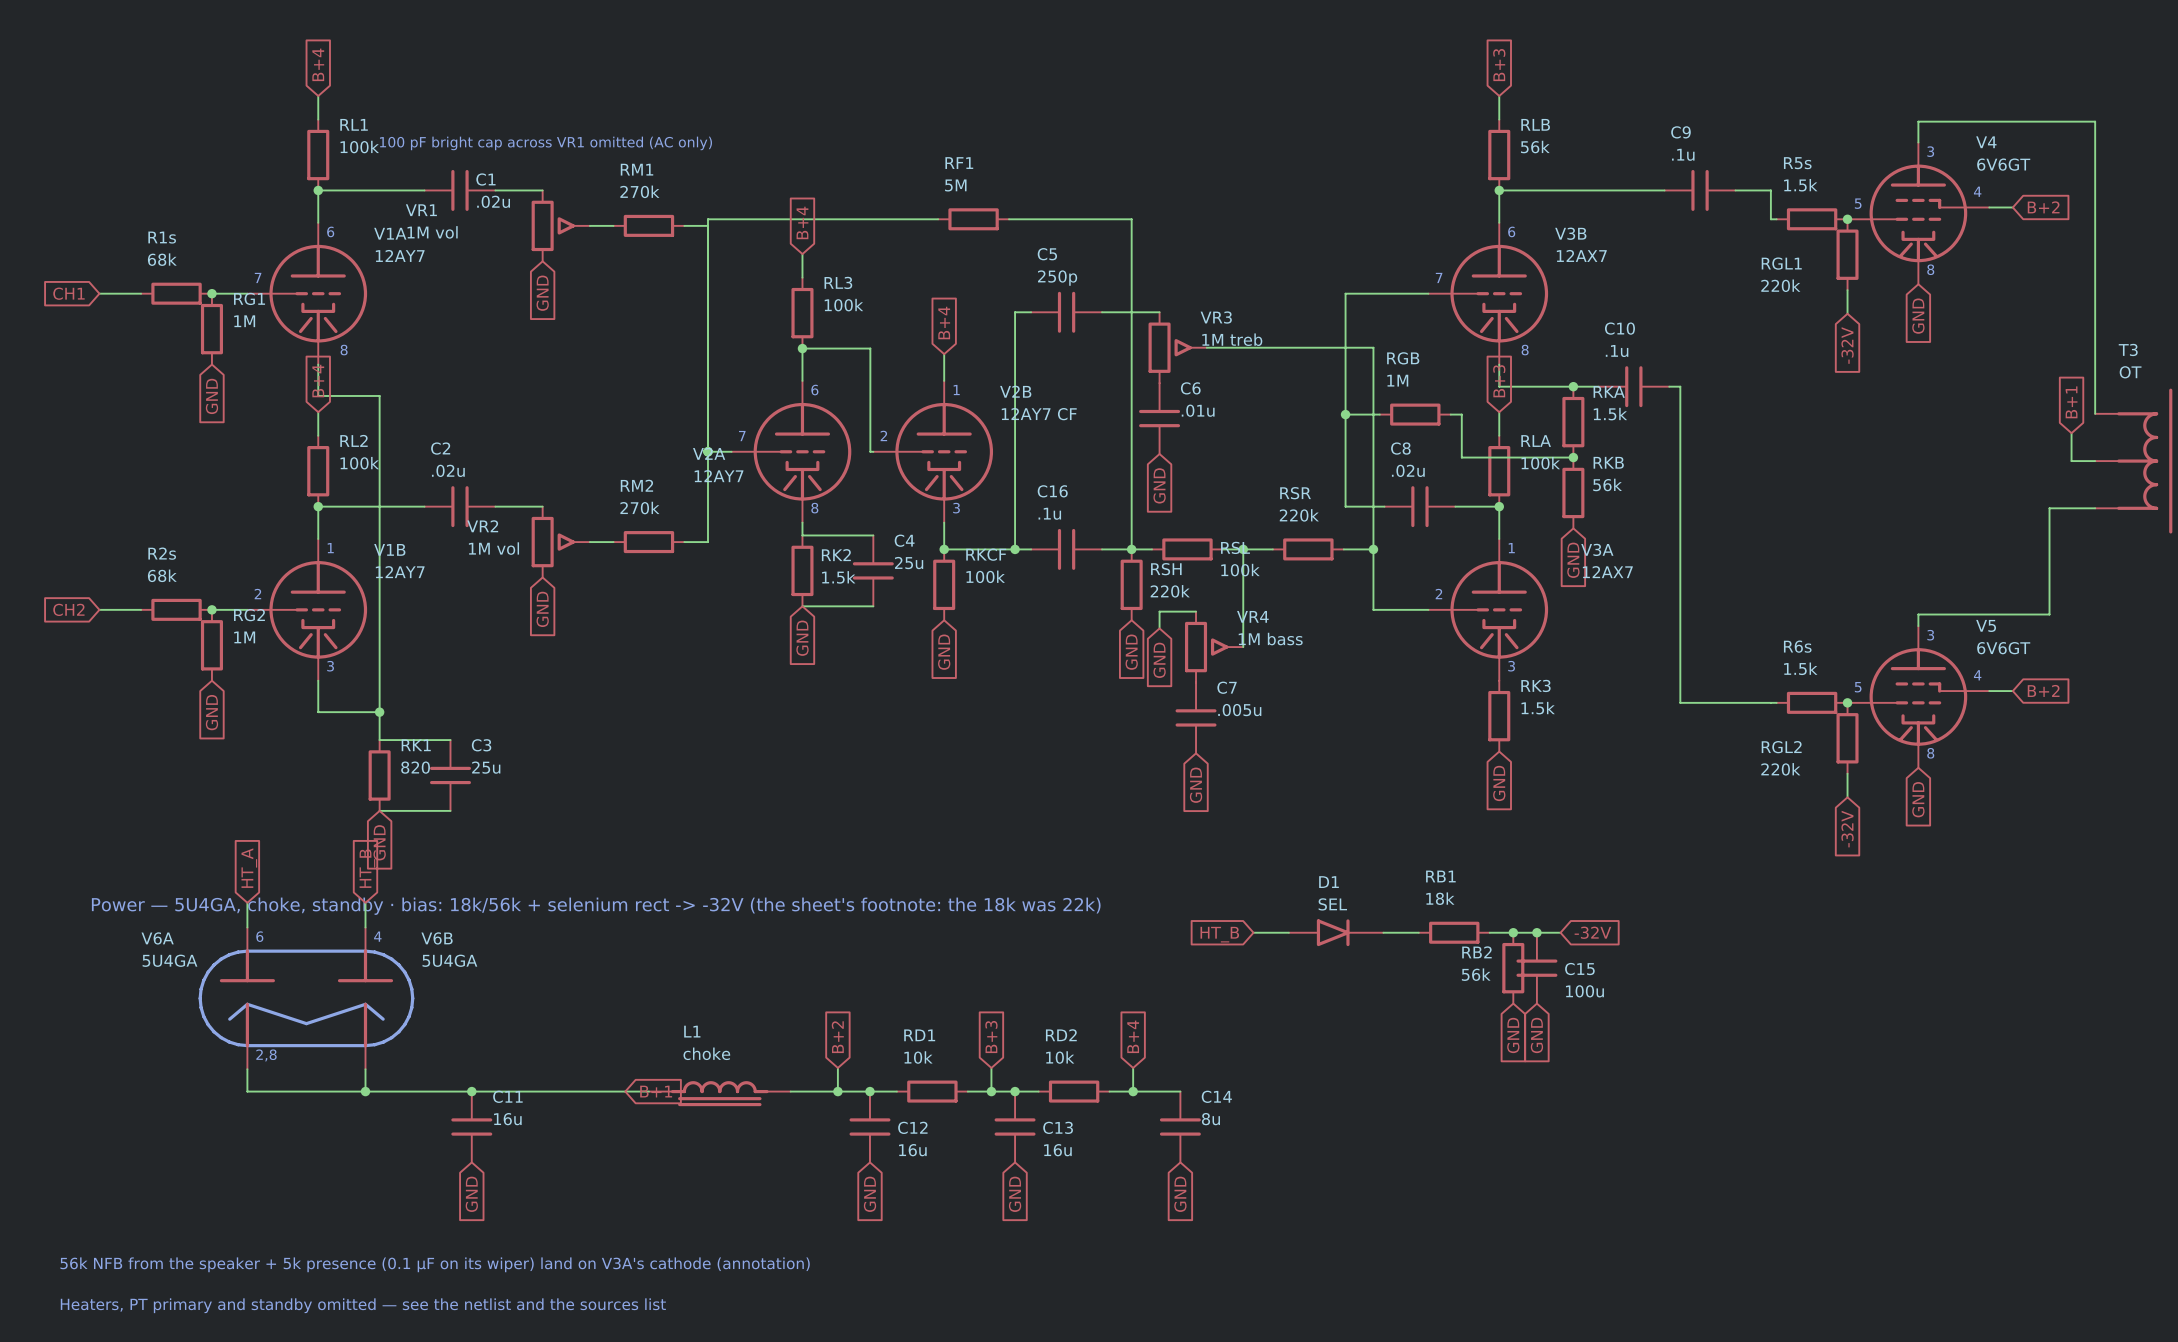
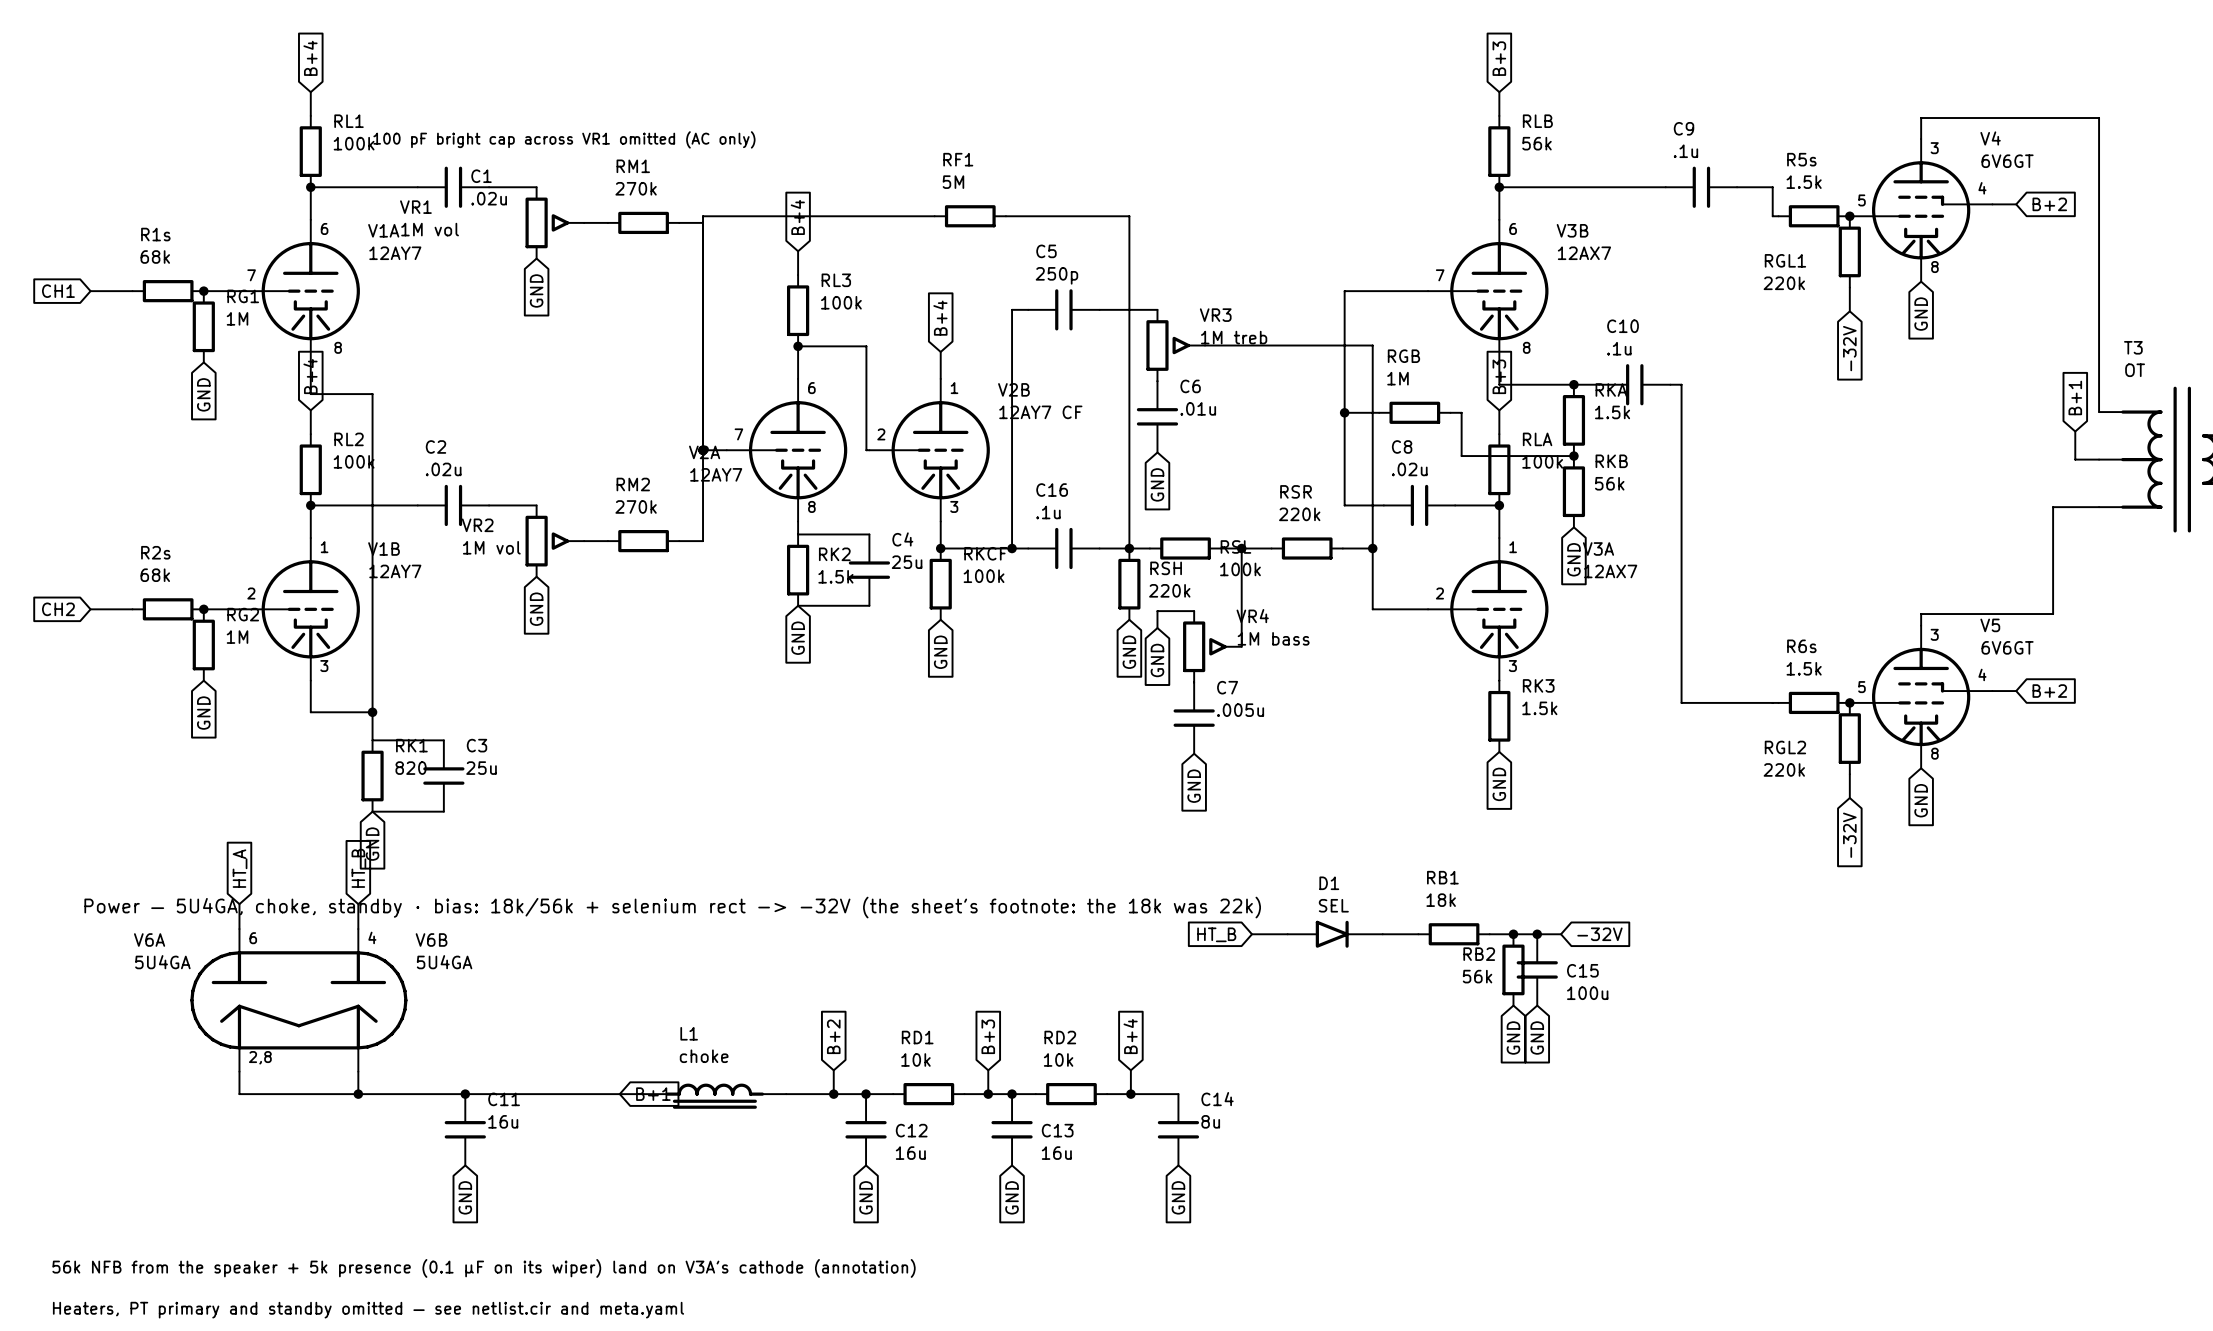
text: Heaters, PT primary and standby omitted — see the netlist and the sources list (363, 1305) -> Heaters, PT primary and standby omitted — see netlist.cir and meta.yaml (368, 1310)

